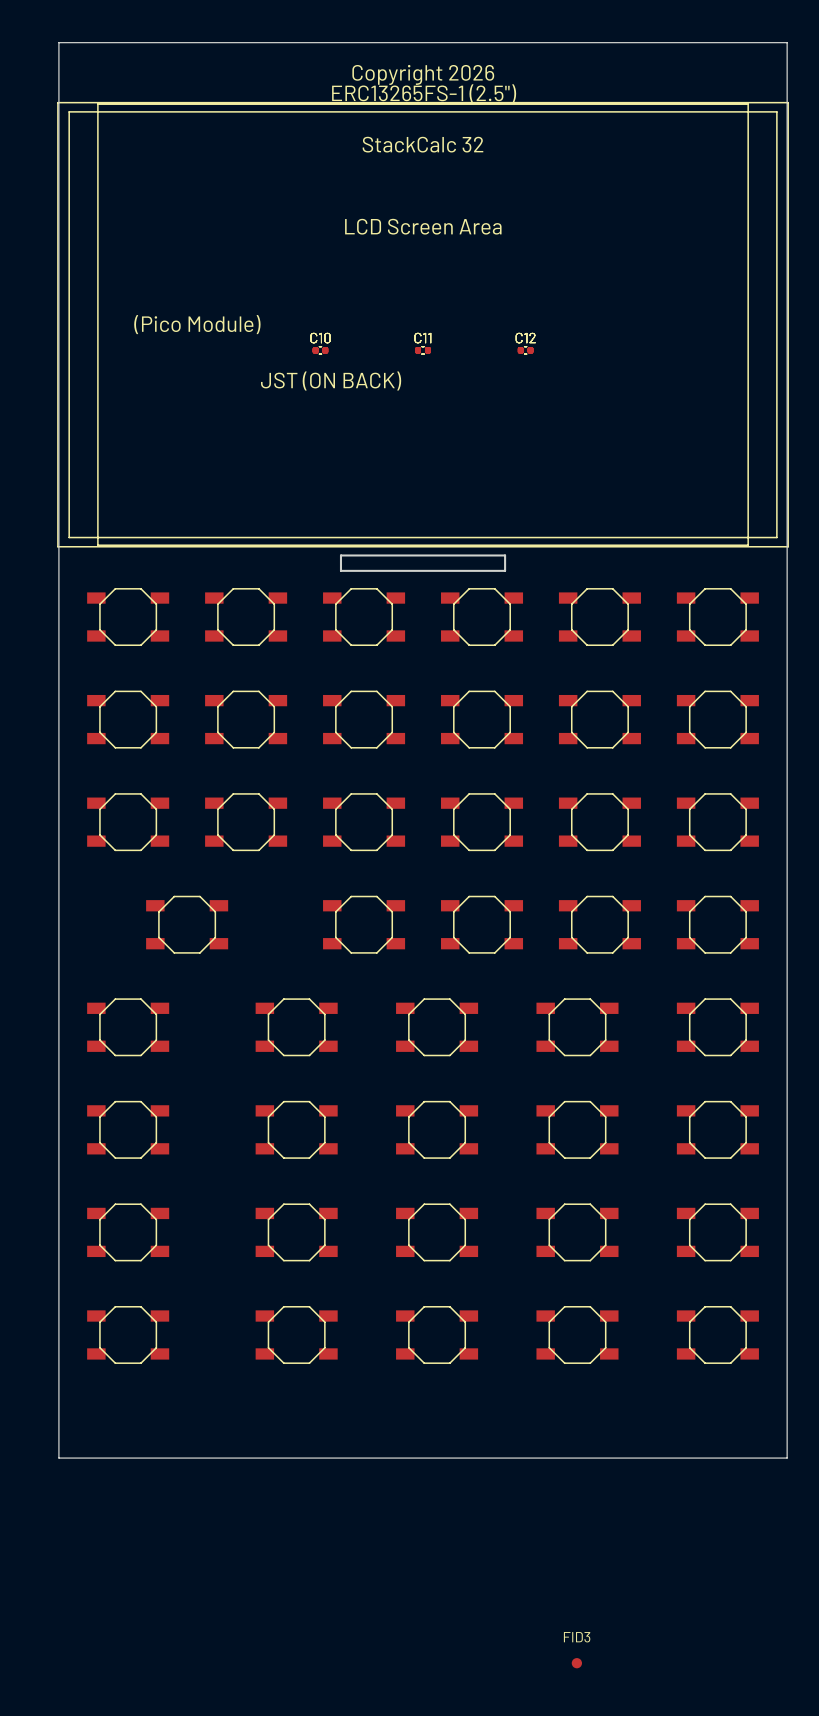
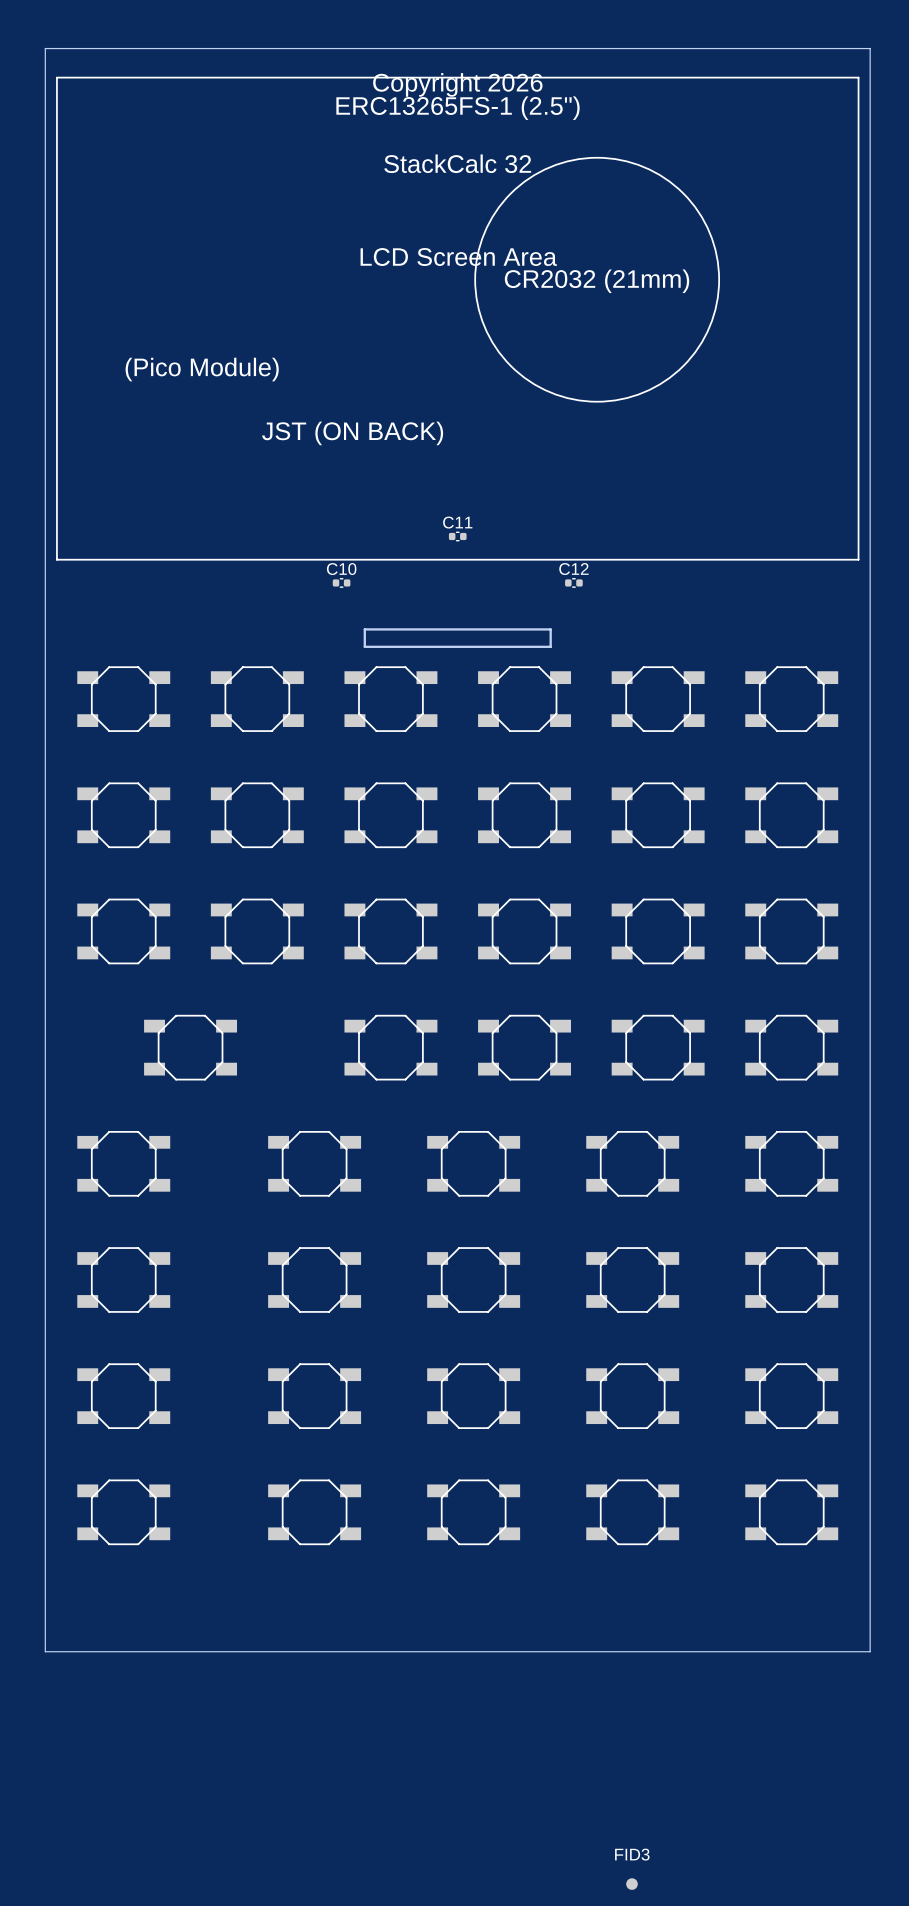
line: (57, 102) (788, 102) (788, 546) (57, 546) (57, 102) -> none
line: (97, 104) (97, 545) (748, 545) (748, 104) (97, 104) -> none
line: (69, 111) (776, 111) -> (56, 126) (56, 77) (858, 77) (858, 126)
drawing: none -> [474, 156, 721, 403]
text: none -> CR2032 (21mm) (597, 281)
C10 position: (320, 350) -> (341, 582)
C11 position: (423, 350) -> (457, 536)
C12 position: (525, 350) -> (573, 582)
line: (69, 493) (69, 537) (776, 537) (776, 493) -> (56, 559) (858, 559)

